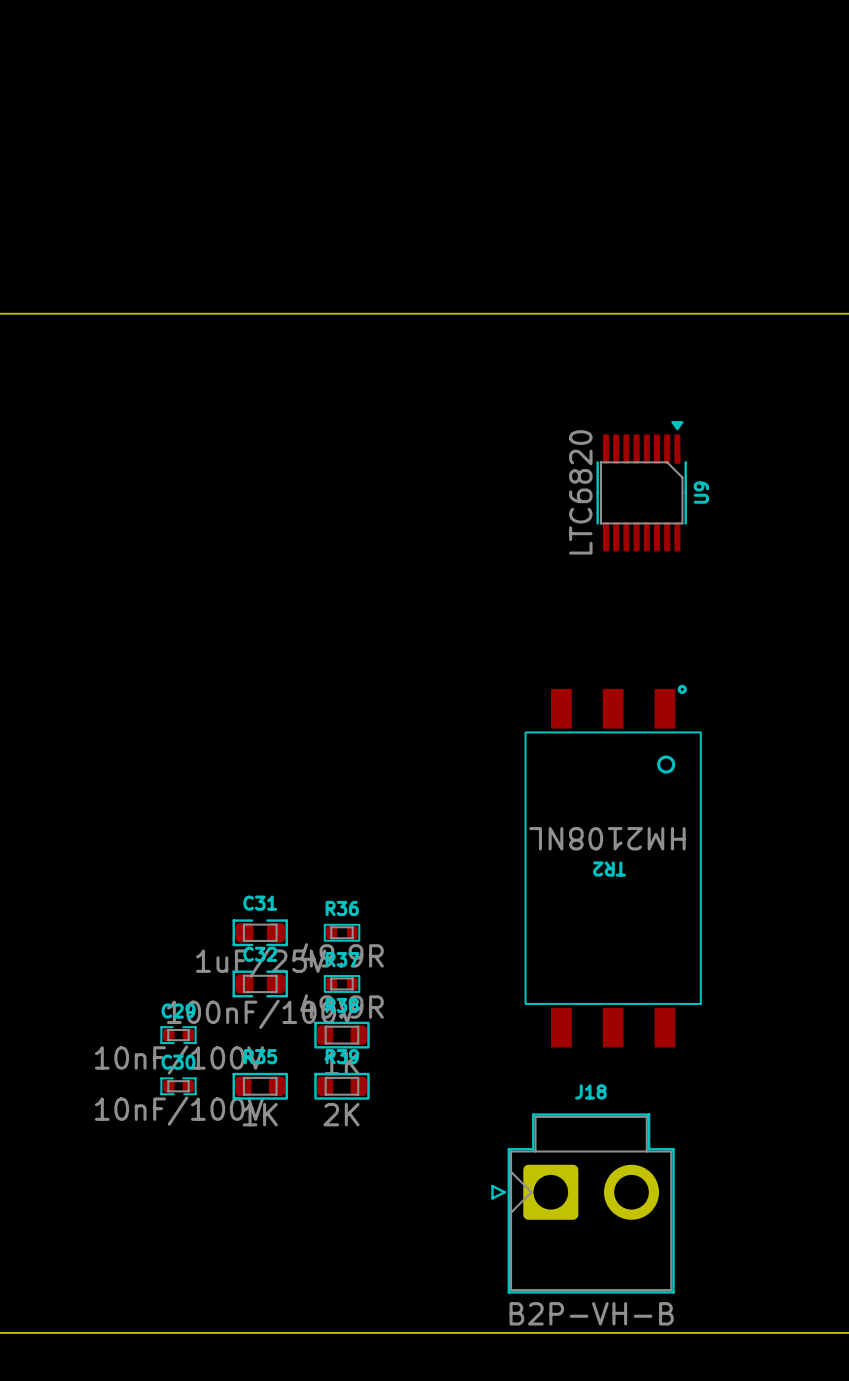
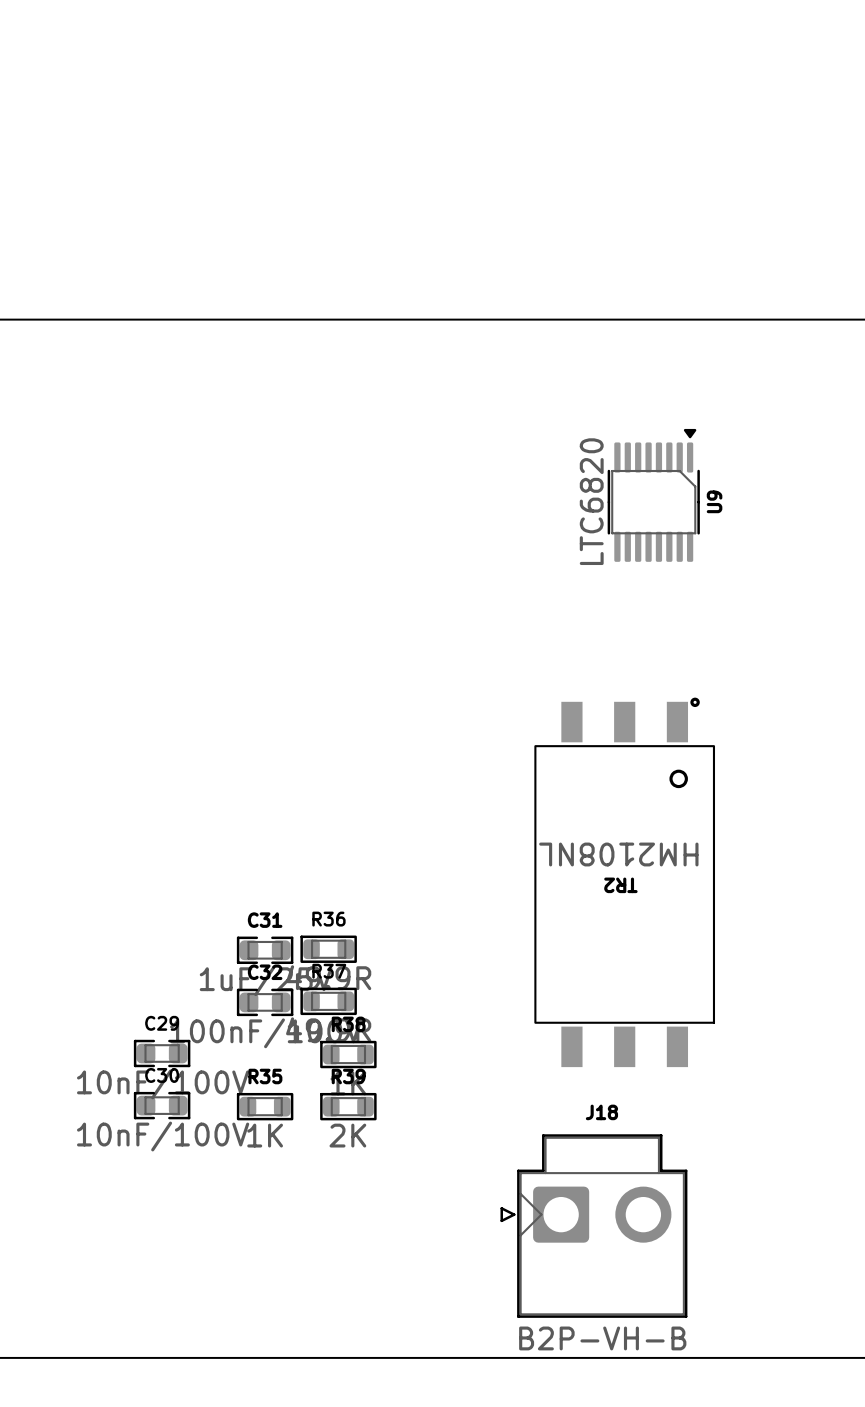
R36 footprint: [323, 923, 361, 942] -> [300, 935, 357, 963]
R37 footprint: [323, 974, 361, 993] -> [300, 987, 357, 1016]
C29 footprint: [160, 1026, 197, 1045] -> [133, 1039, 191, 1068]
C30 footprint: [160, 1077, 197, 1096] -> [133, 1091, 191, 1120]

